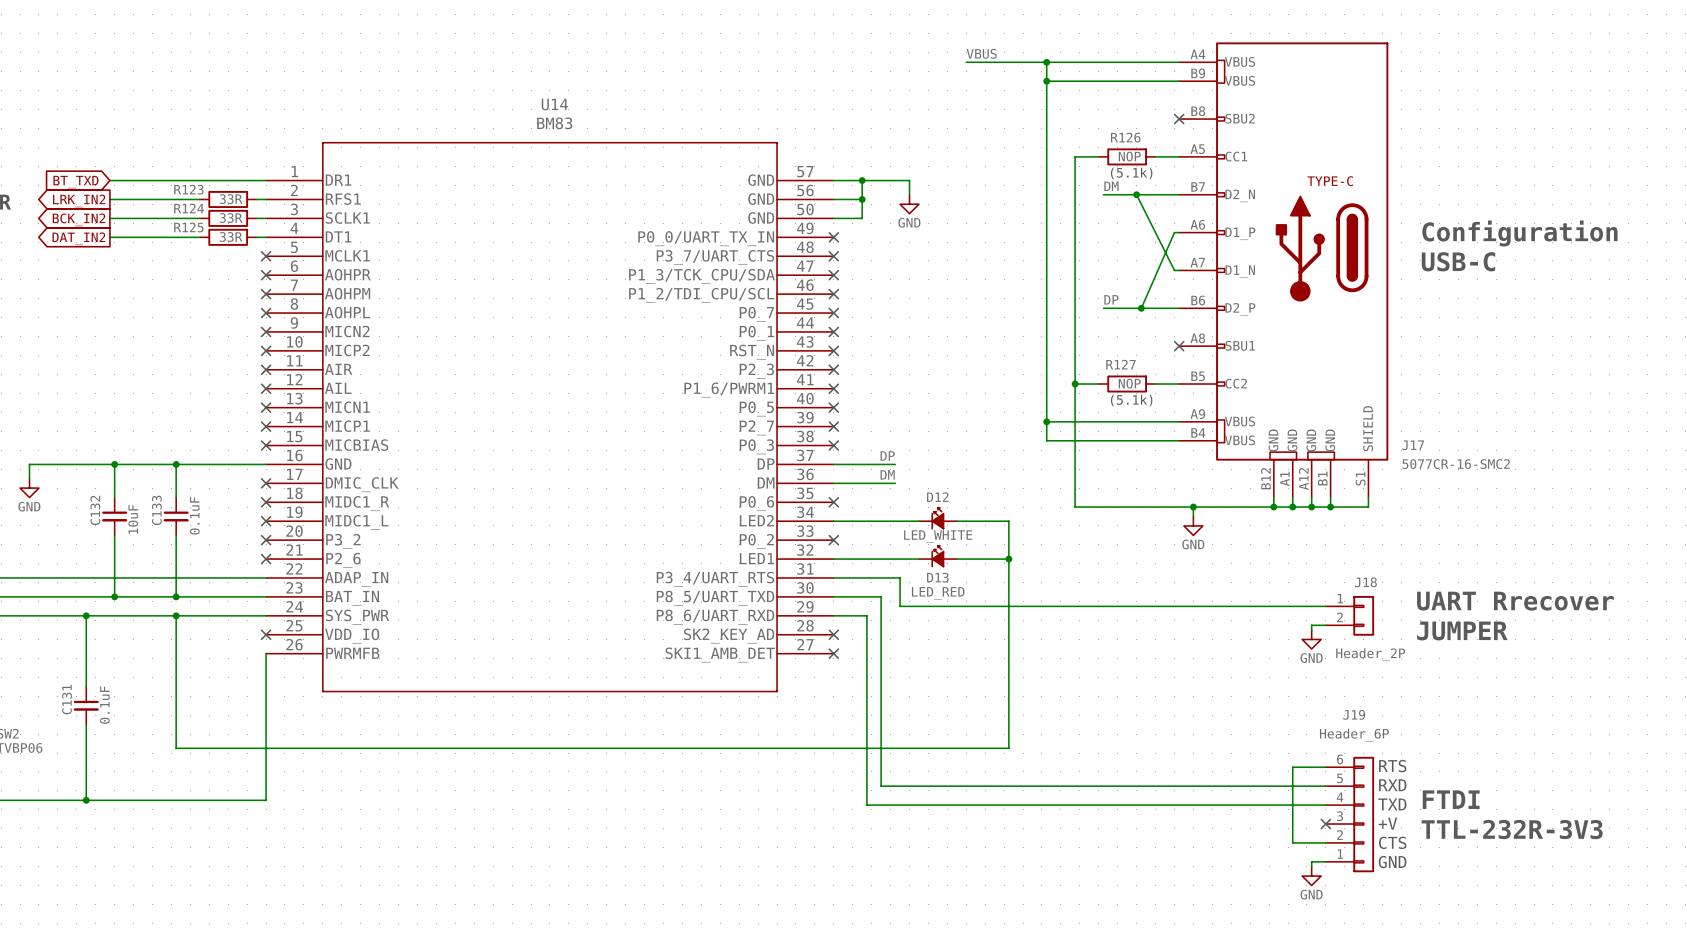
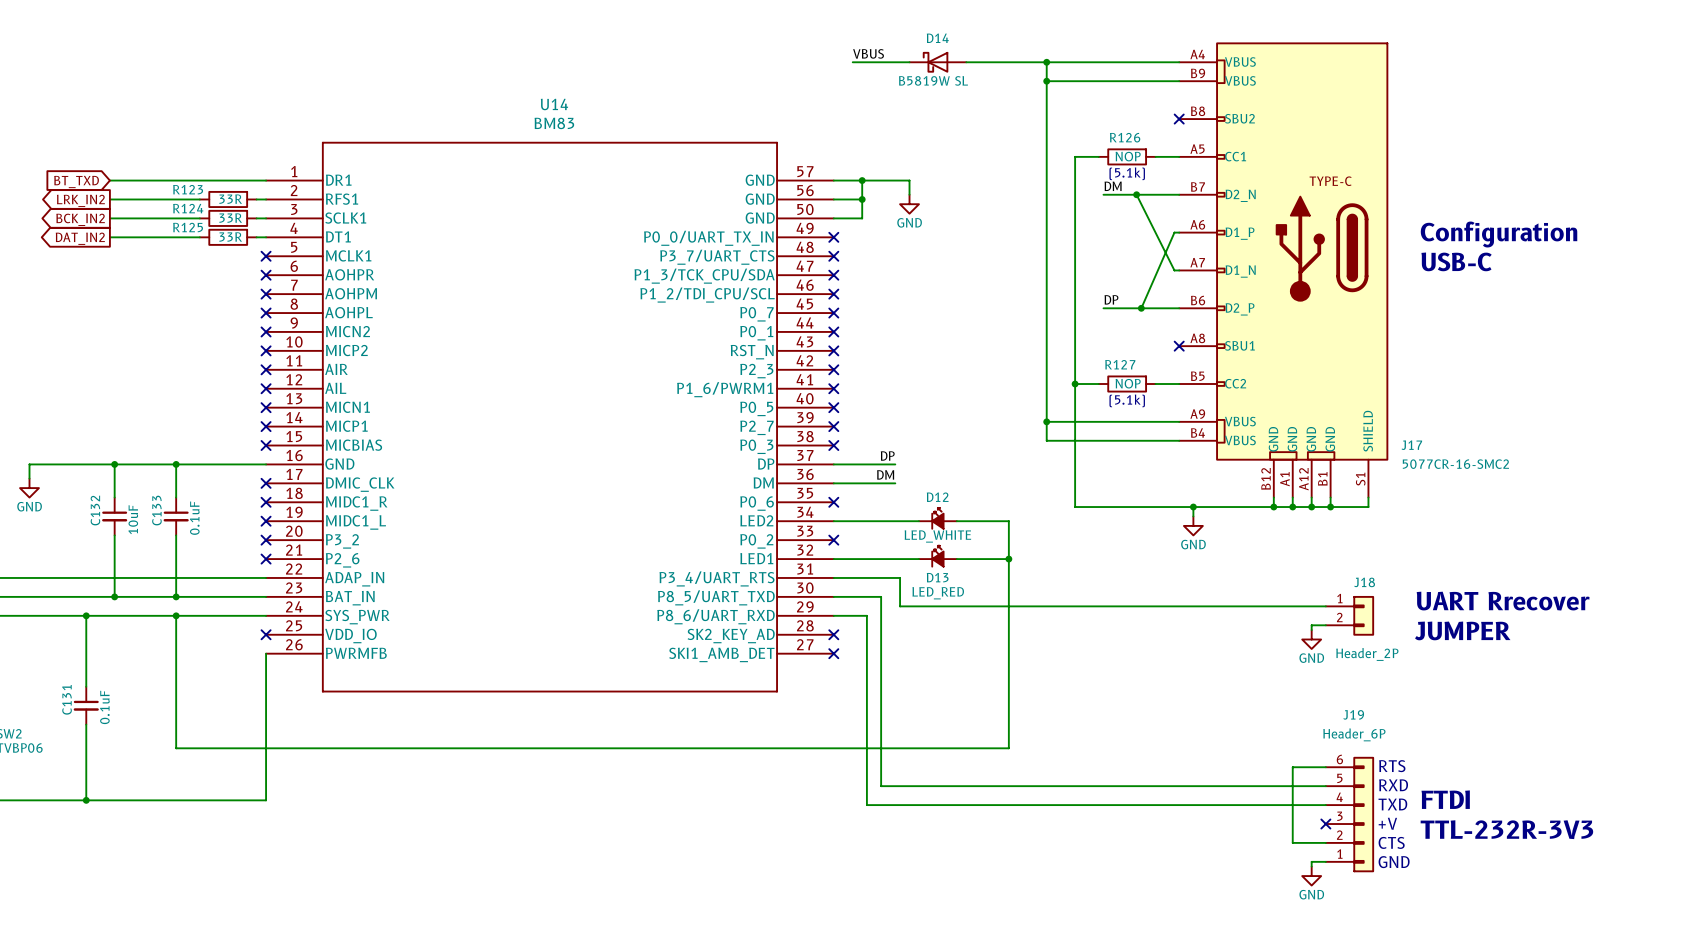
label position: VBUS (981, 53) -> VBUS (868, 53)
wire: none -> (852, 62) (909, 62)
D14: none -> B5819W SL (937, 62)

